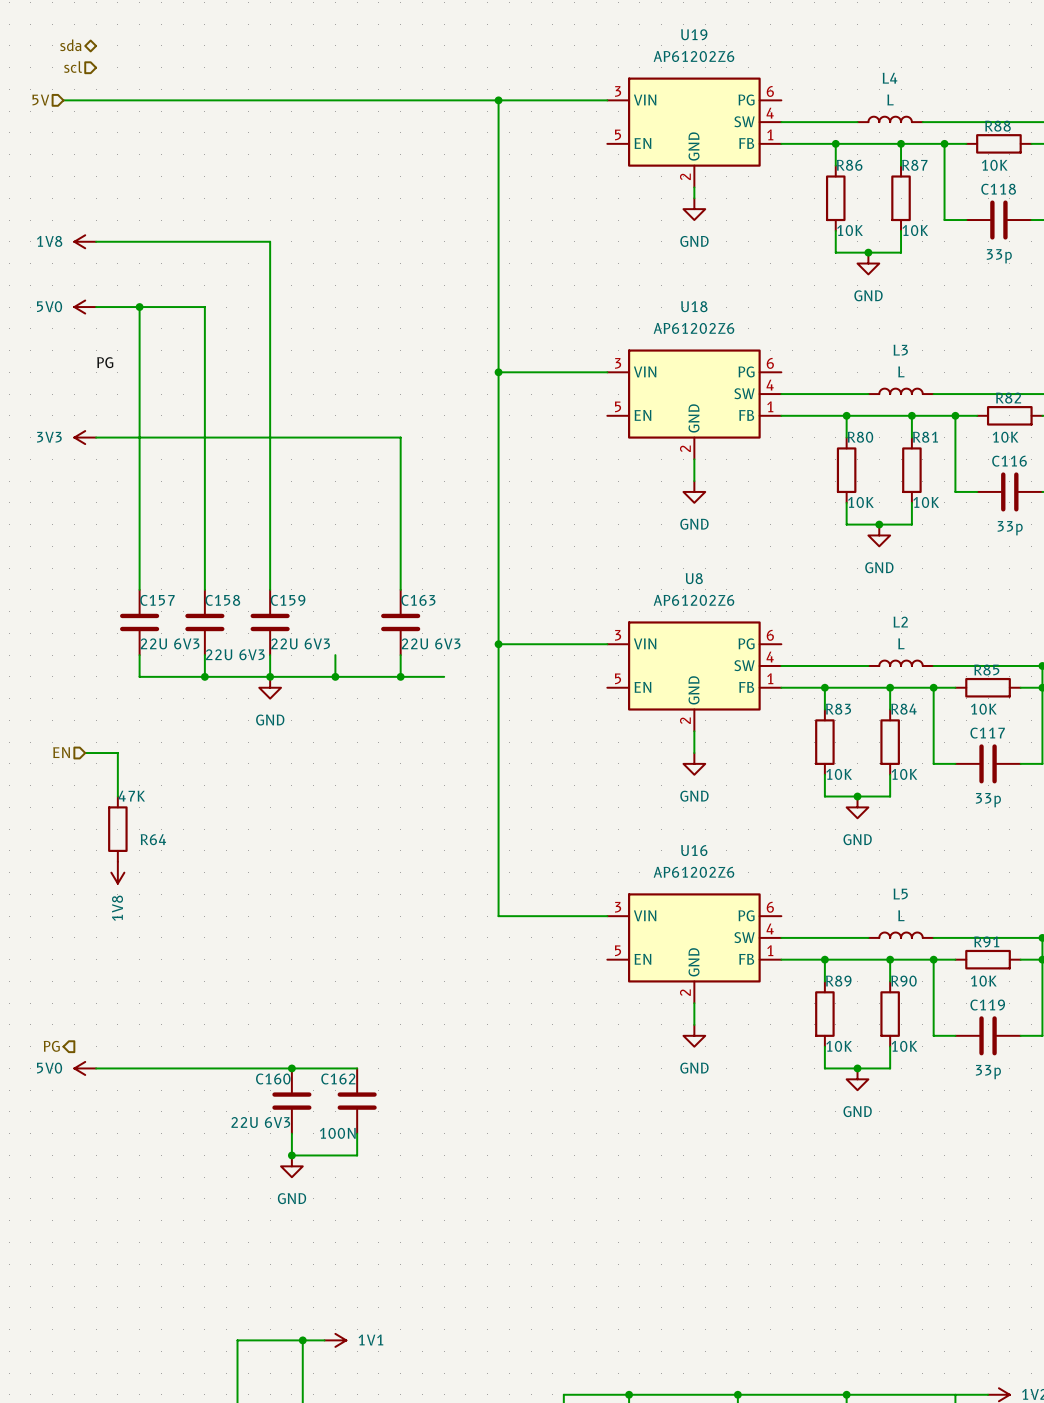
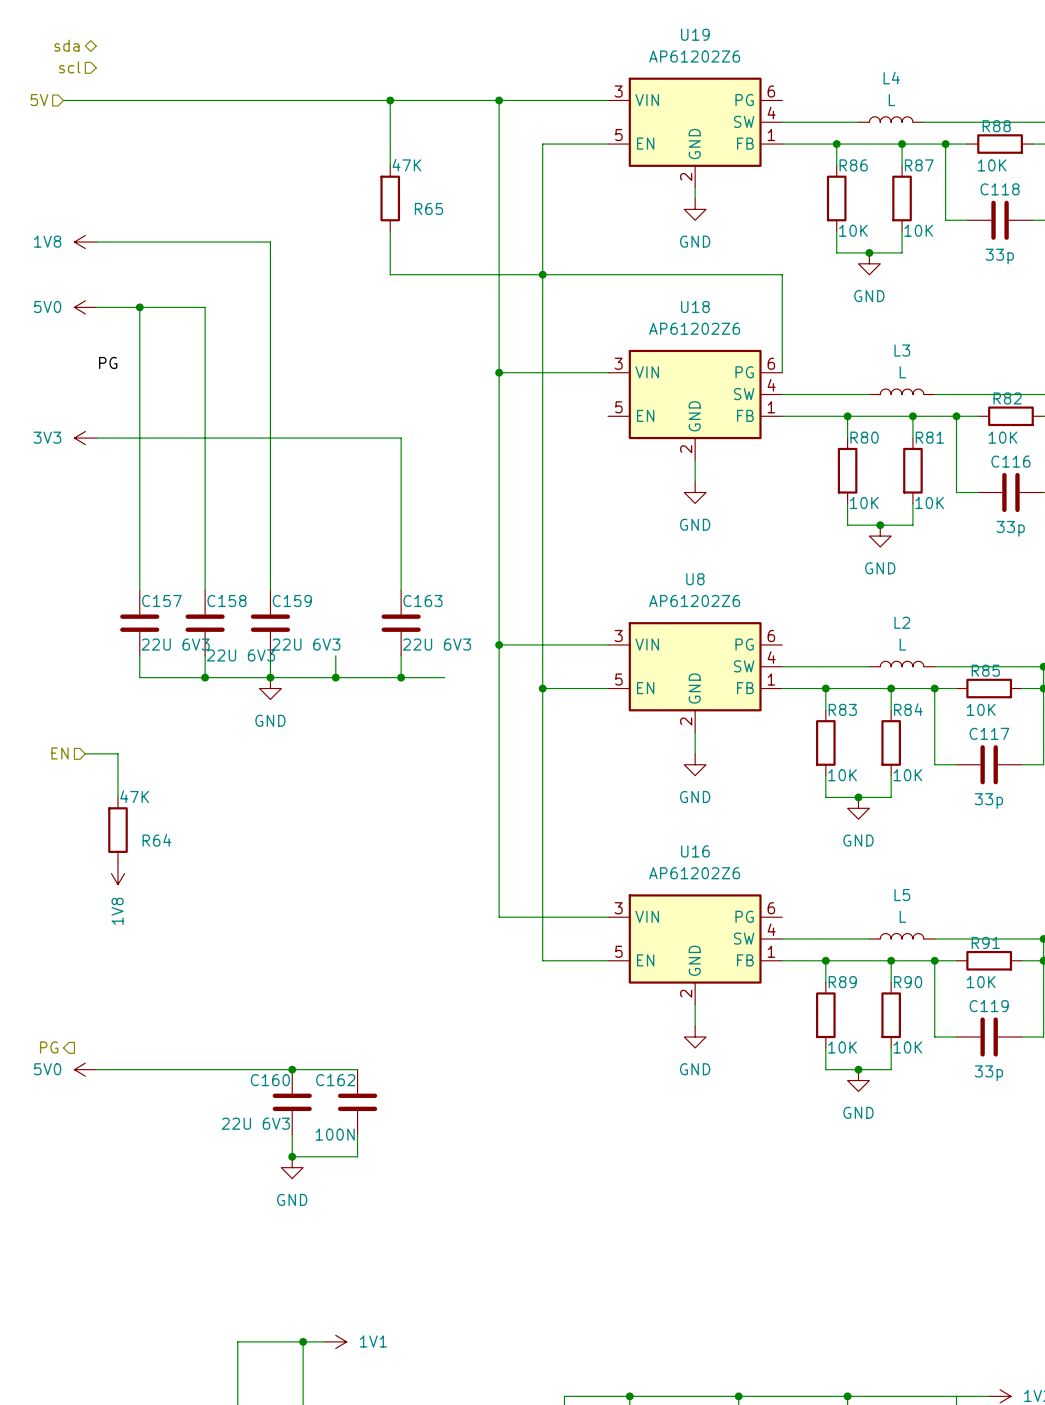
wire: none -> (390, 100) (390, 165)
junction: none -> (390, 100)
wire: none -> (608, 144) (542, 144) (542, 960) (608, 960)
R65: none -> 47K (390, 198)
wire: none -> (390, 231) (390, 274) (782, 274) (782, 372)
junction: none -> (542, 274)
wire: none -> (542, 688) (608, 688)
junction: none -> (542, 688)

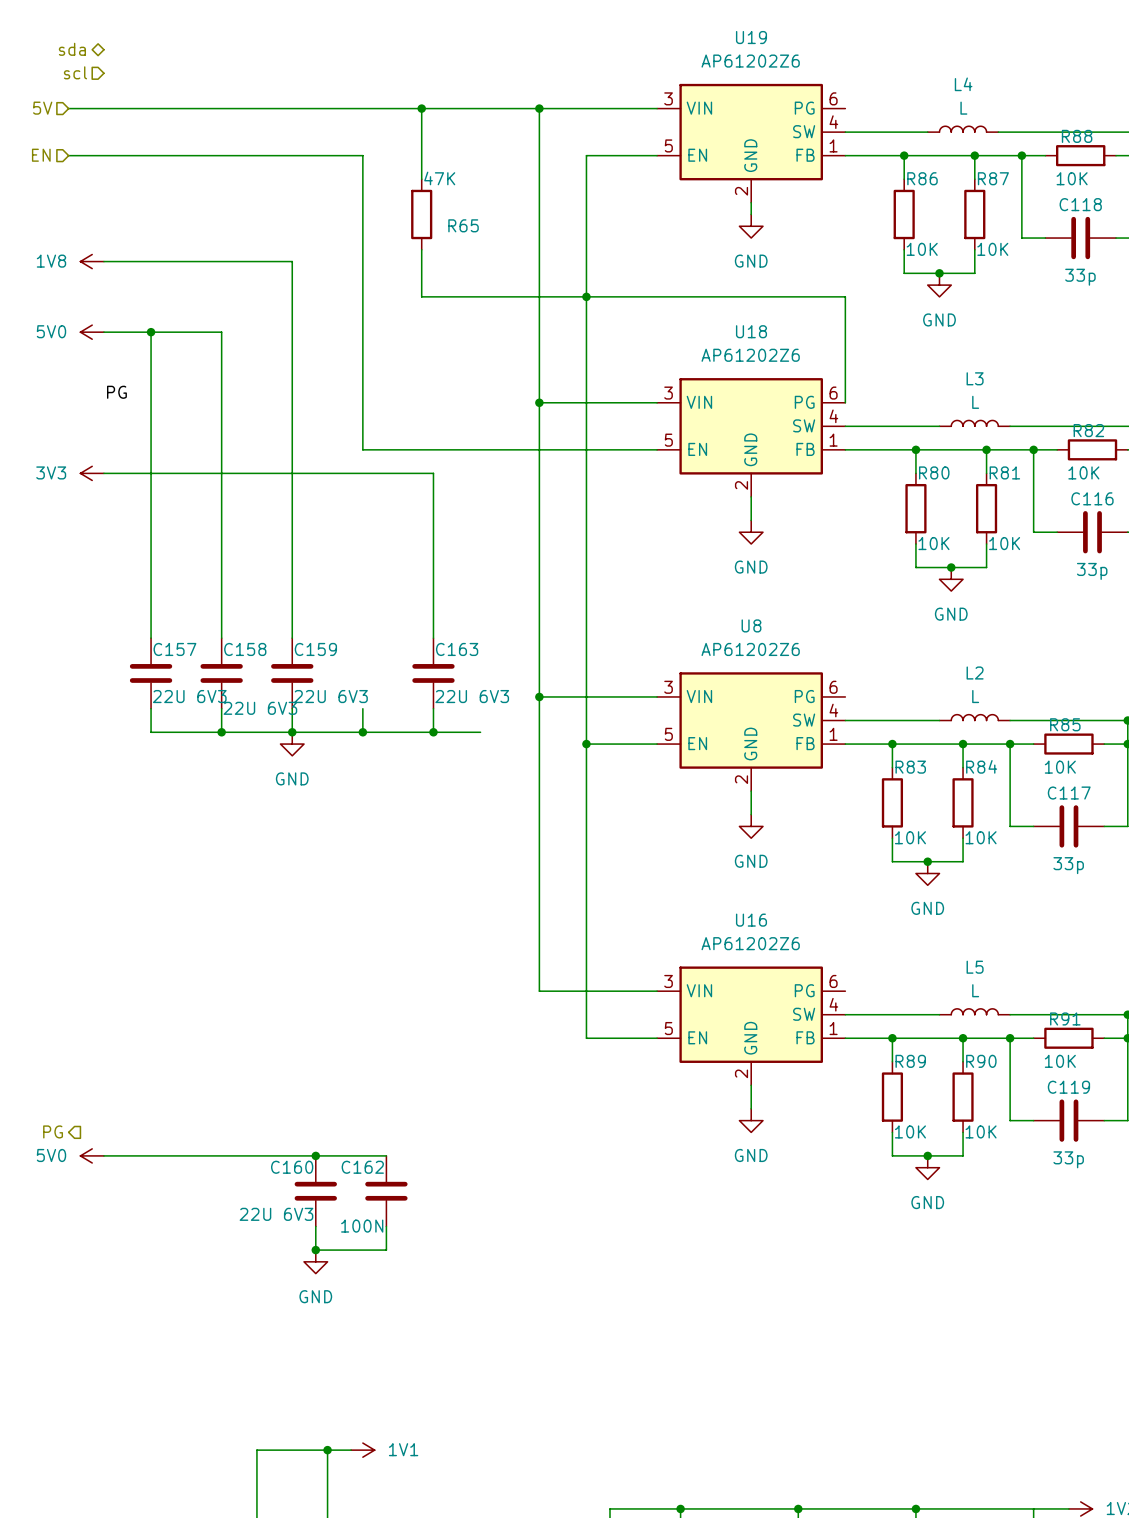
hierarchical label: none -> EN (41, 155)
wire: none -> (68, 155) (362, 155) (362, 449) (657, 449)
hierarchical label: EN (60, 753) -> none
wire: (85, 753) (117, 753) (117, 797) -> none
R64: 47K (117, 830) -> none
power symbol: 1V8 (117, 873) -> none

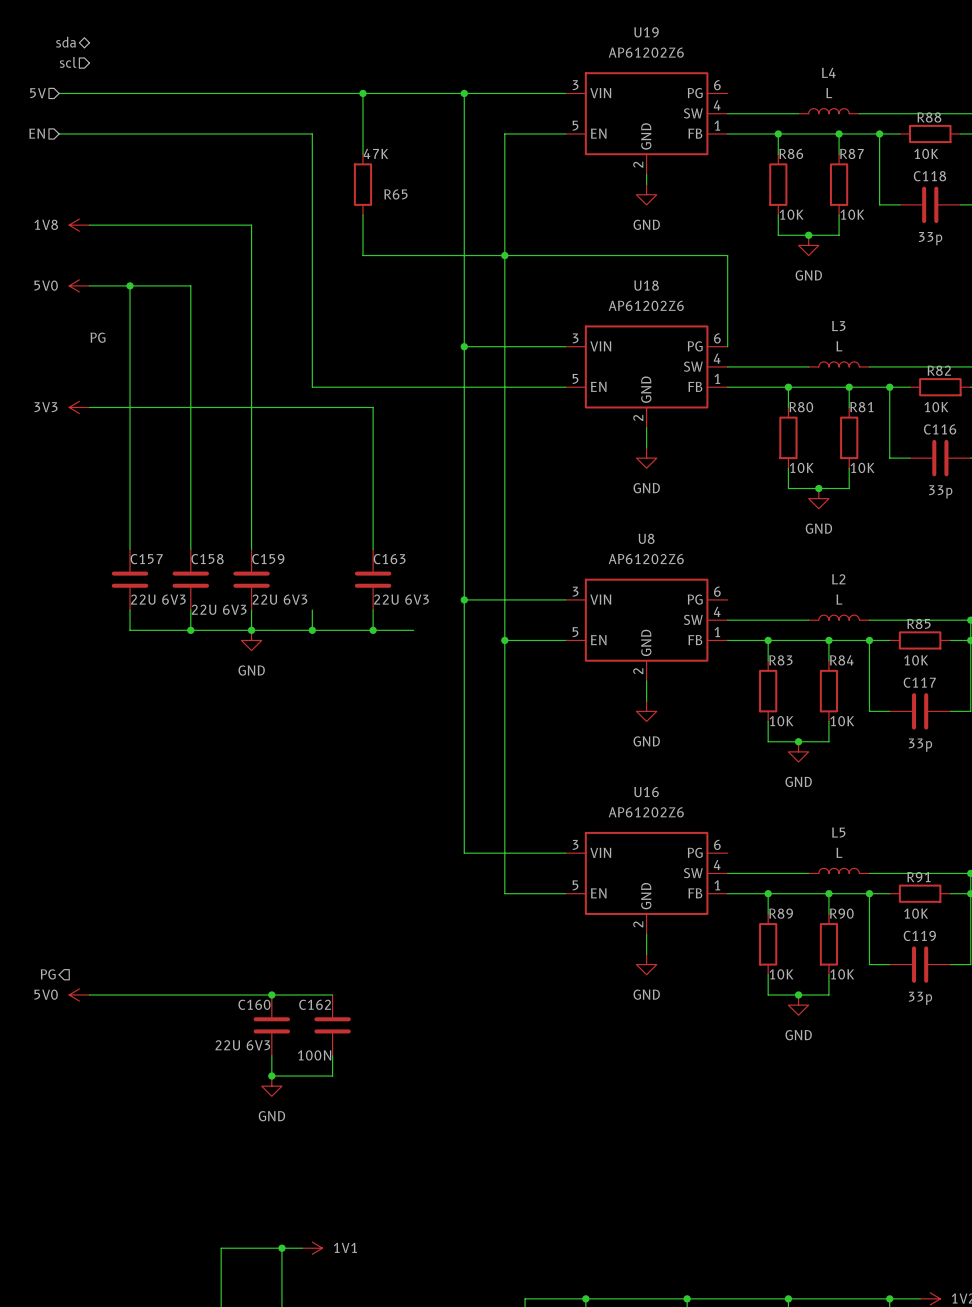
junction: none -> (889, 1298)

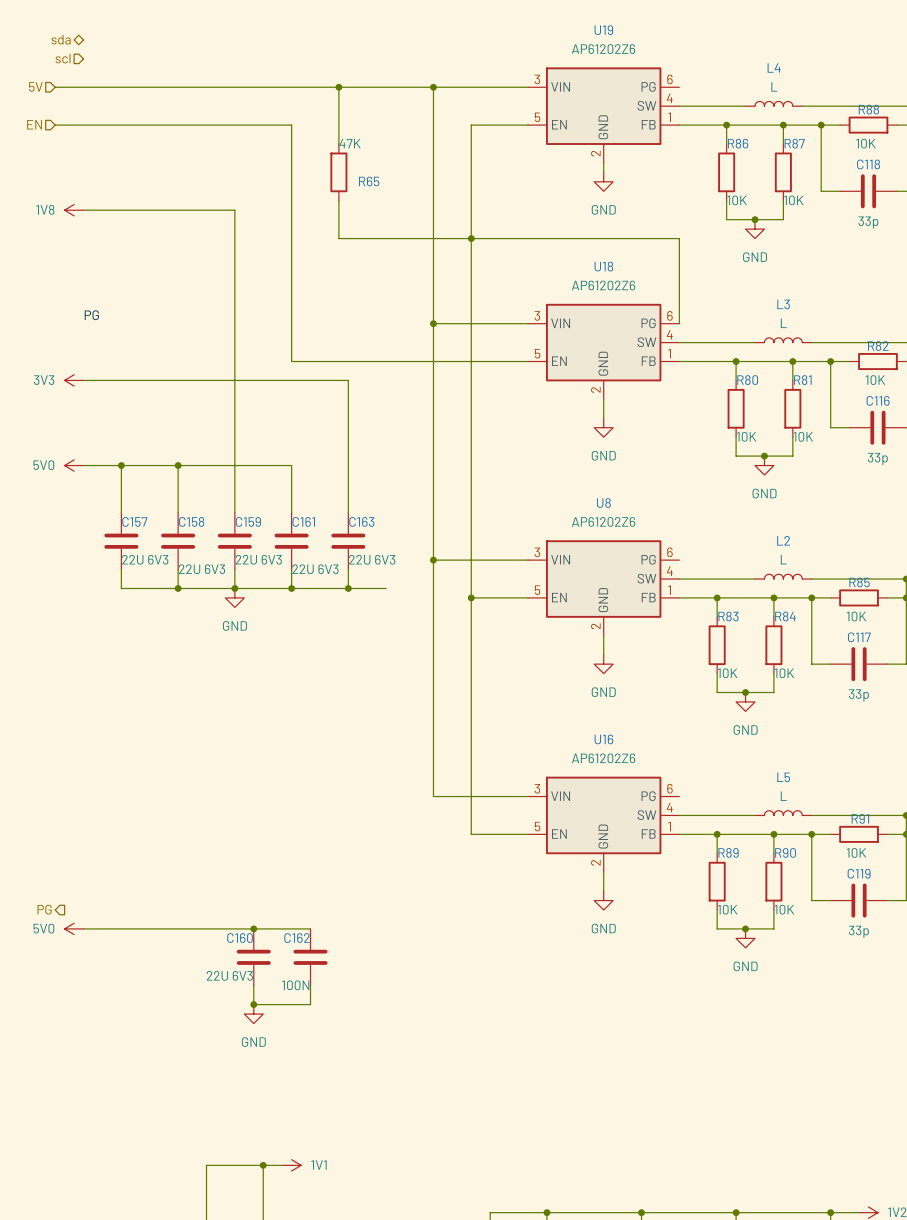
power symbol: 5V0 (79, 285) -> none
wire: (89, 285) (190, 285) (190, 498) -> none
wire: (130, 285) (130, 498) -> none
junction: (130, 285) -> none
power symbol: none -> 5V0 (74, 465)
wire: none -> (83, 465) (291, 465) (291, 512)
junction: none -> (121, 465)
junction: none -> (178, 465)
C161: none -> 22U 6V3 (291, 541)

